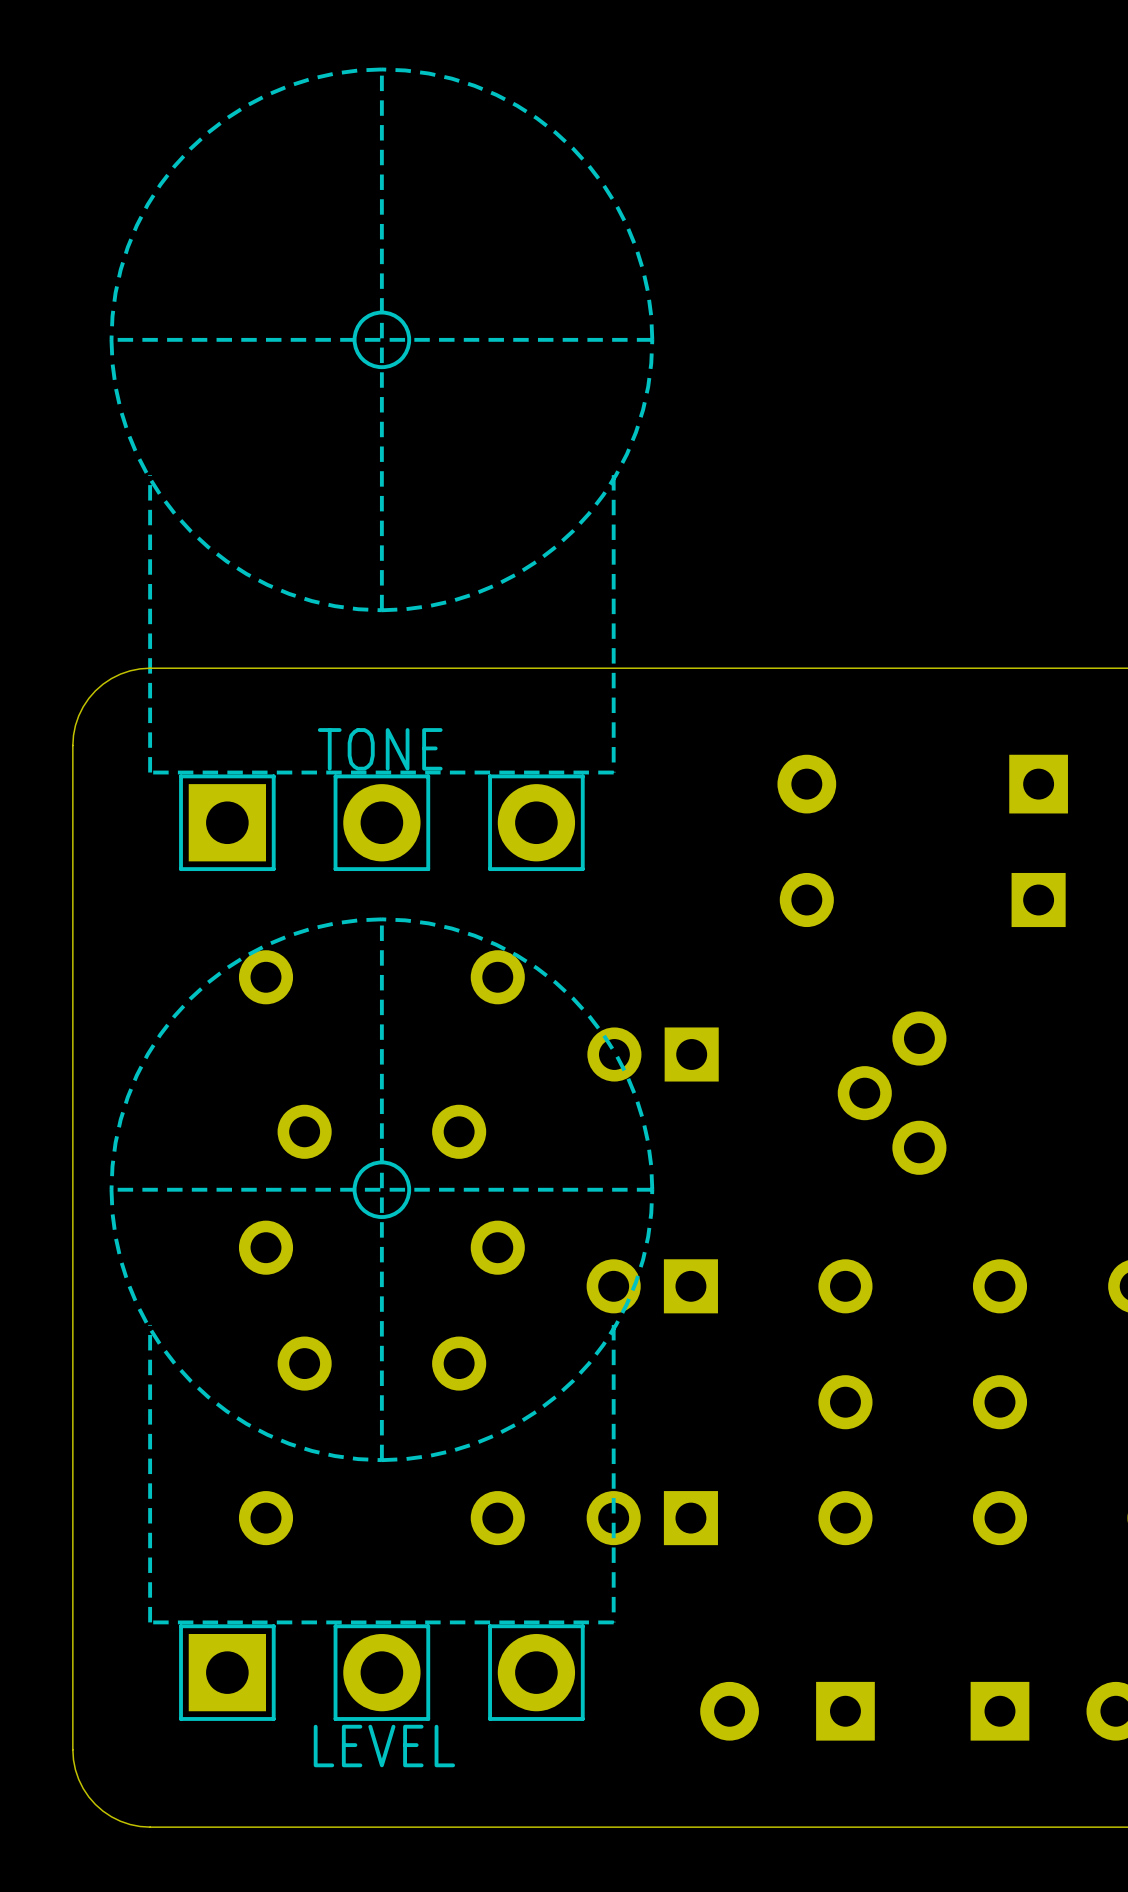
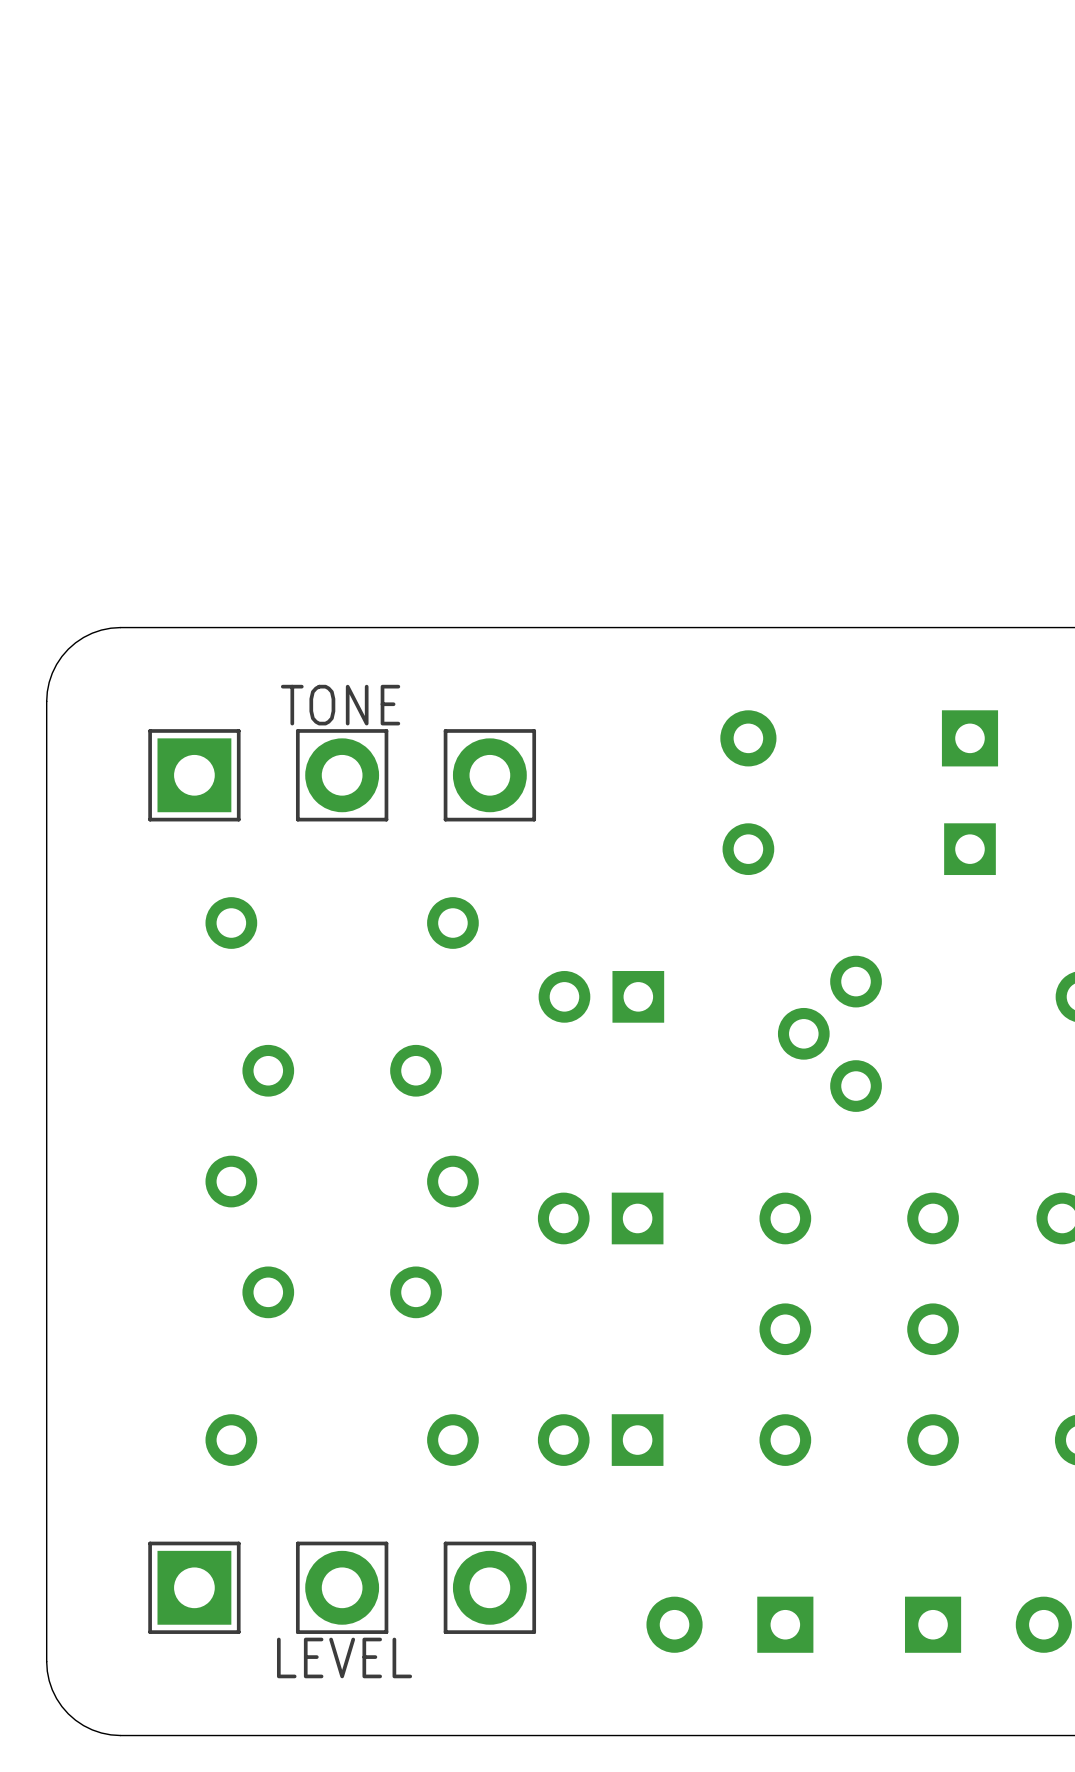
TONE: (381, 469) -> none
TONE: none -> (342, 775)
LEVEL: (381, 1319) -> none
LEVEL: none -> (342, 1587)

